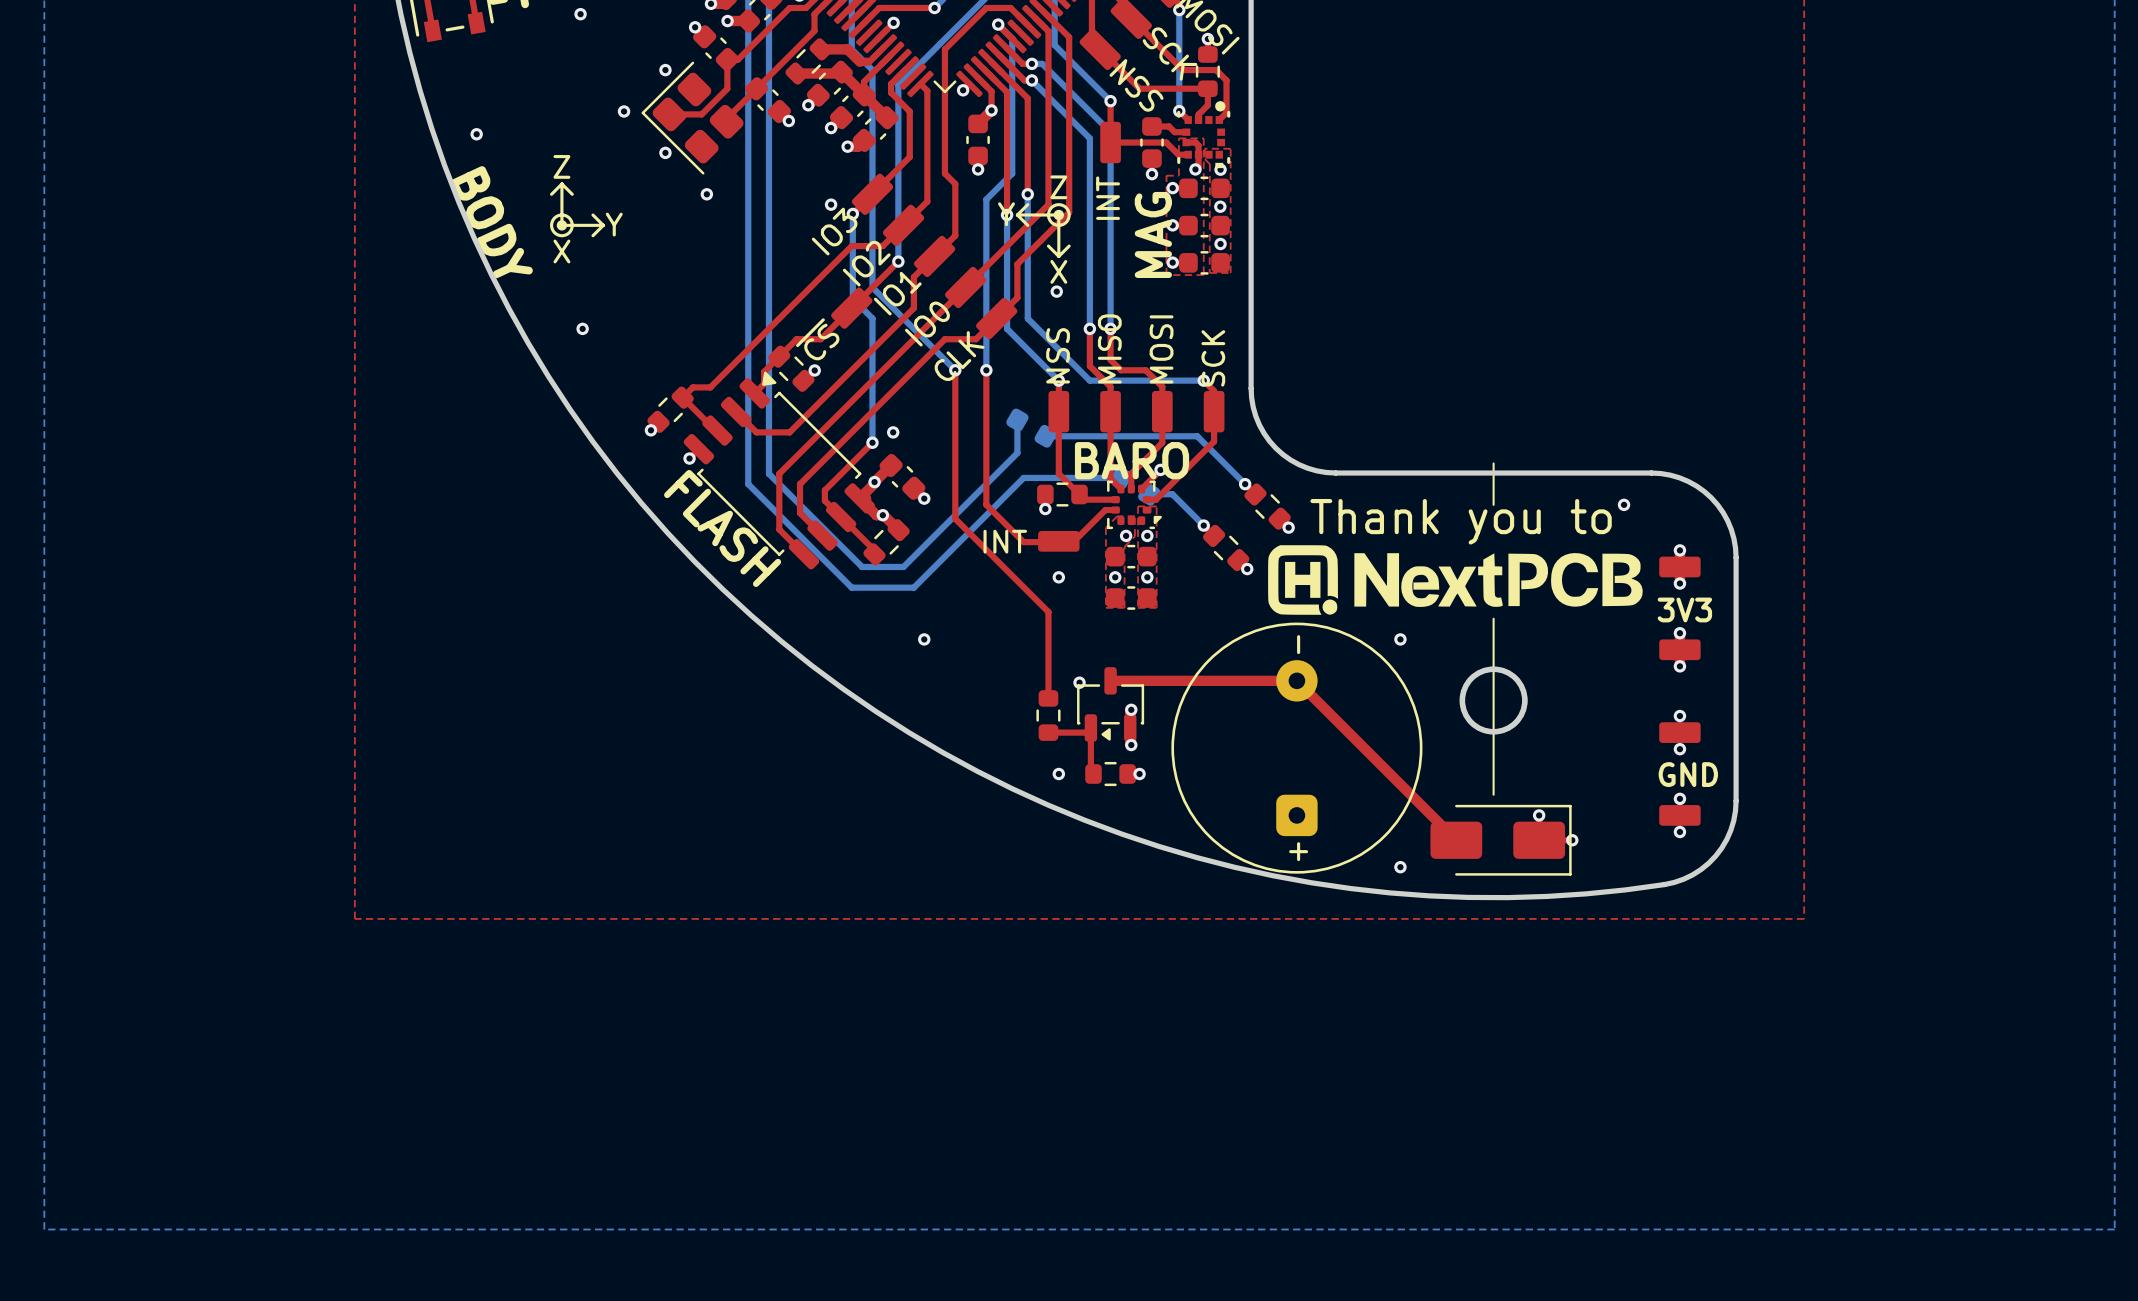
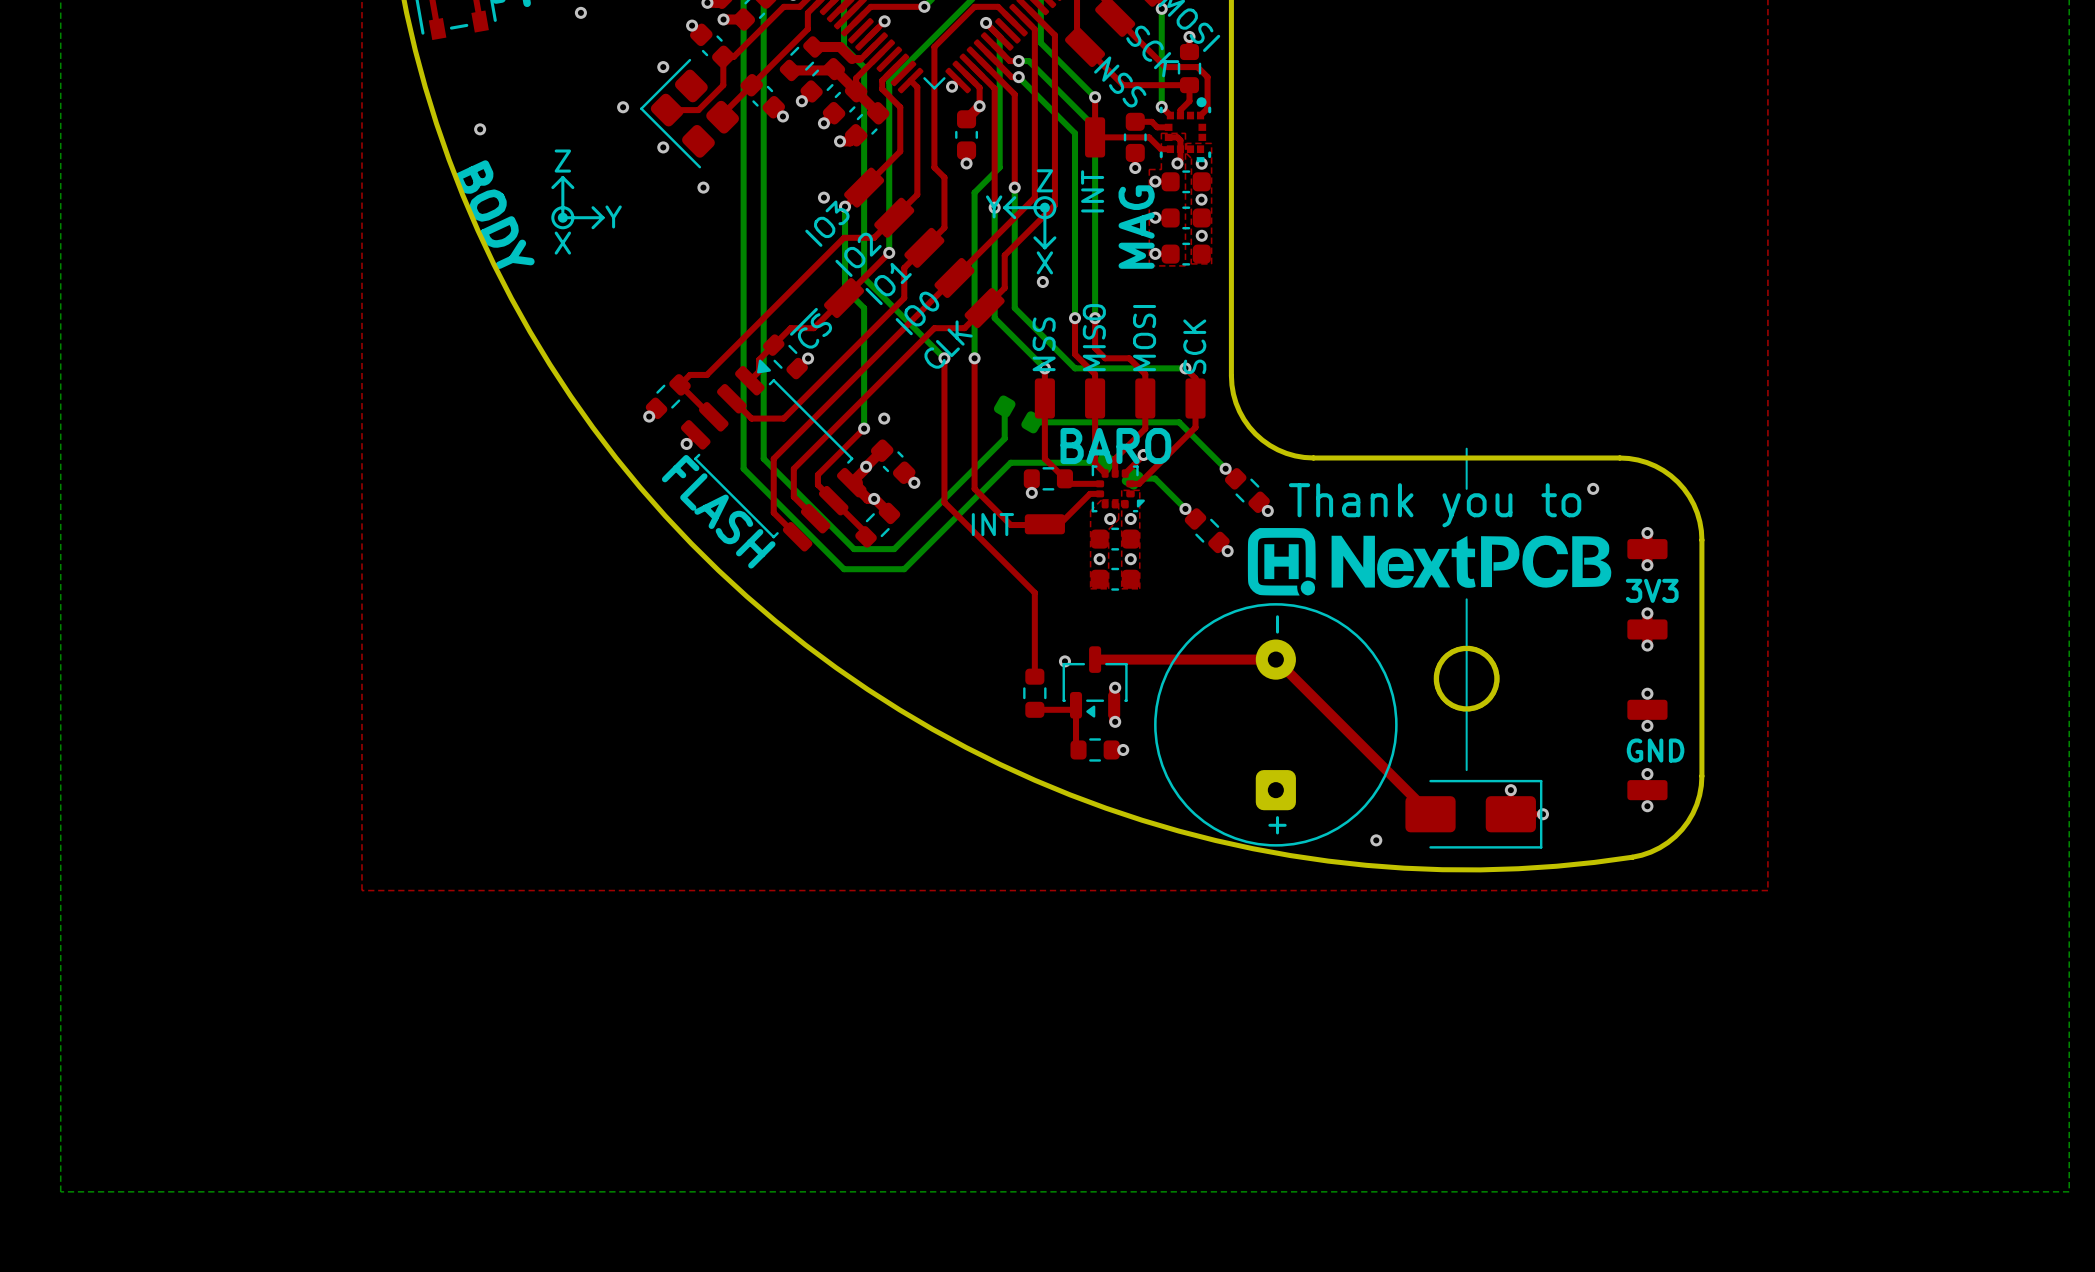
via: (582, 328) -> none
via: (1058, 577) -> none
via: (924, 639) -> none
via: (1400, 639) -> none
via: (1058, 774) -> none

